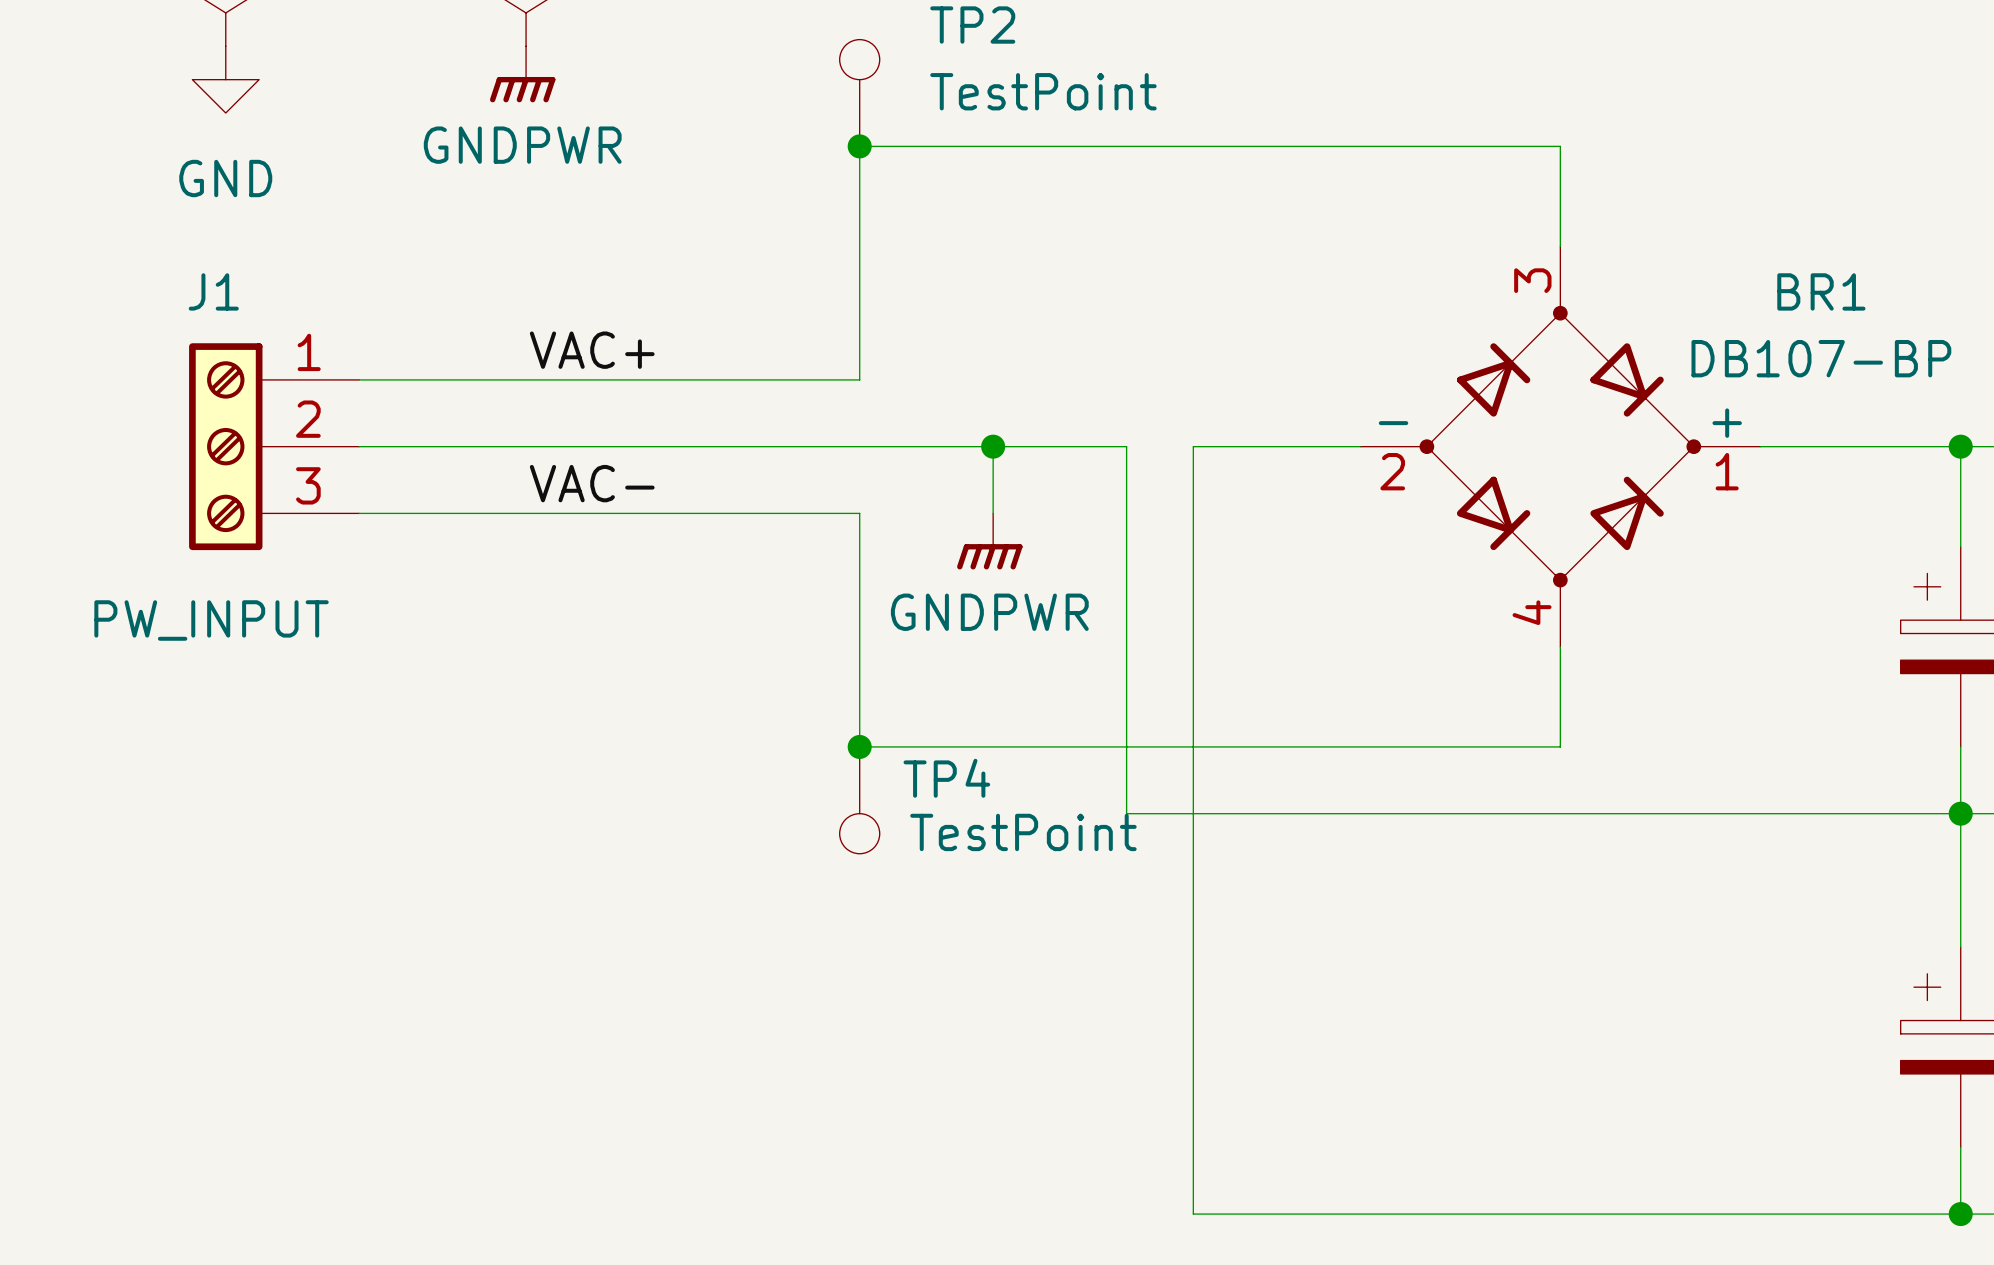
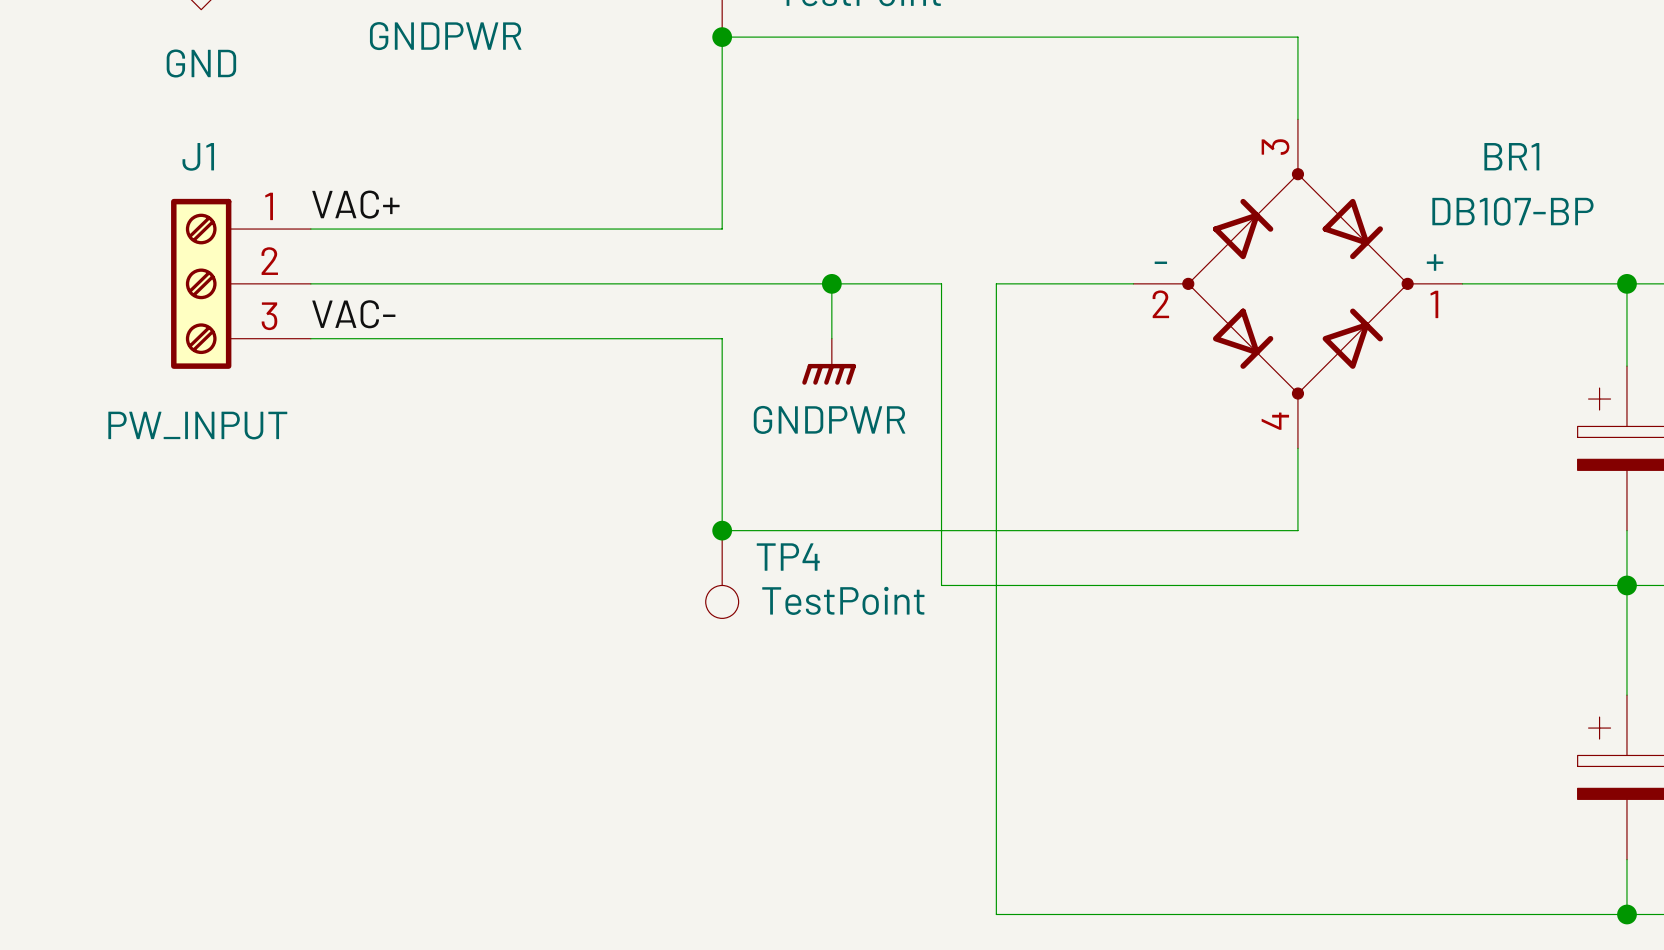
label position: VAC+ (592, 350) -> VAC+ (355, 204)
label position: VAC- (592, 483) -> VAC- (353, 314)

